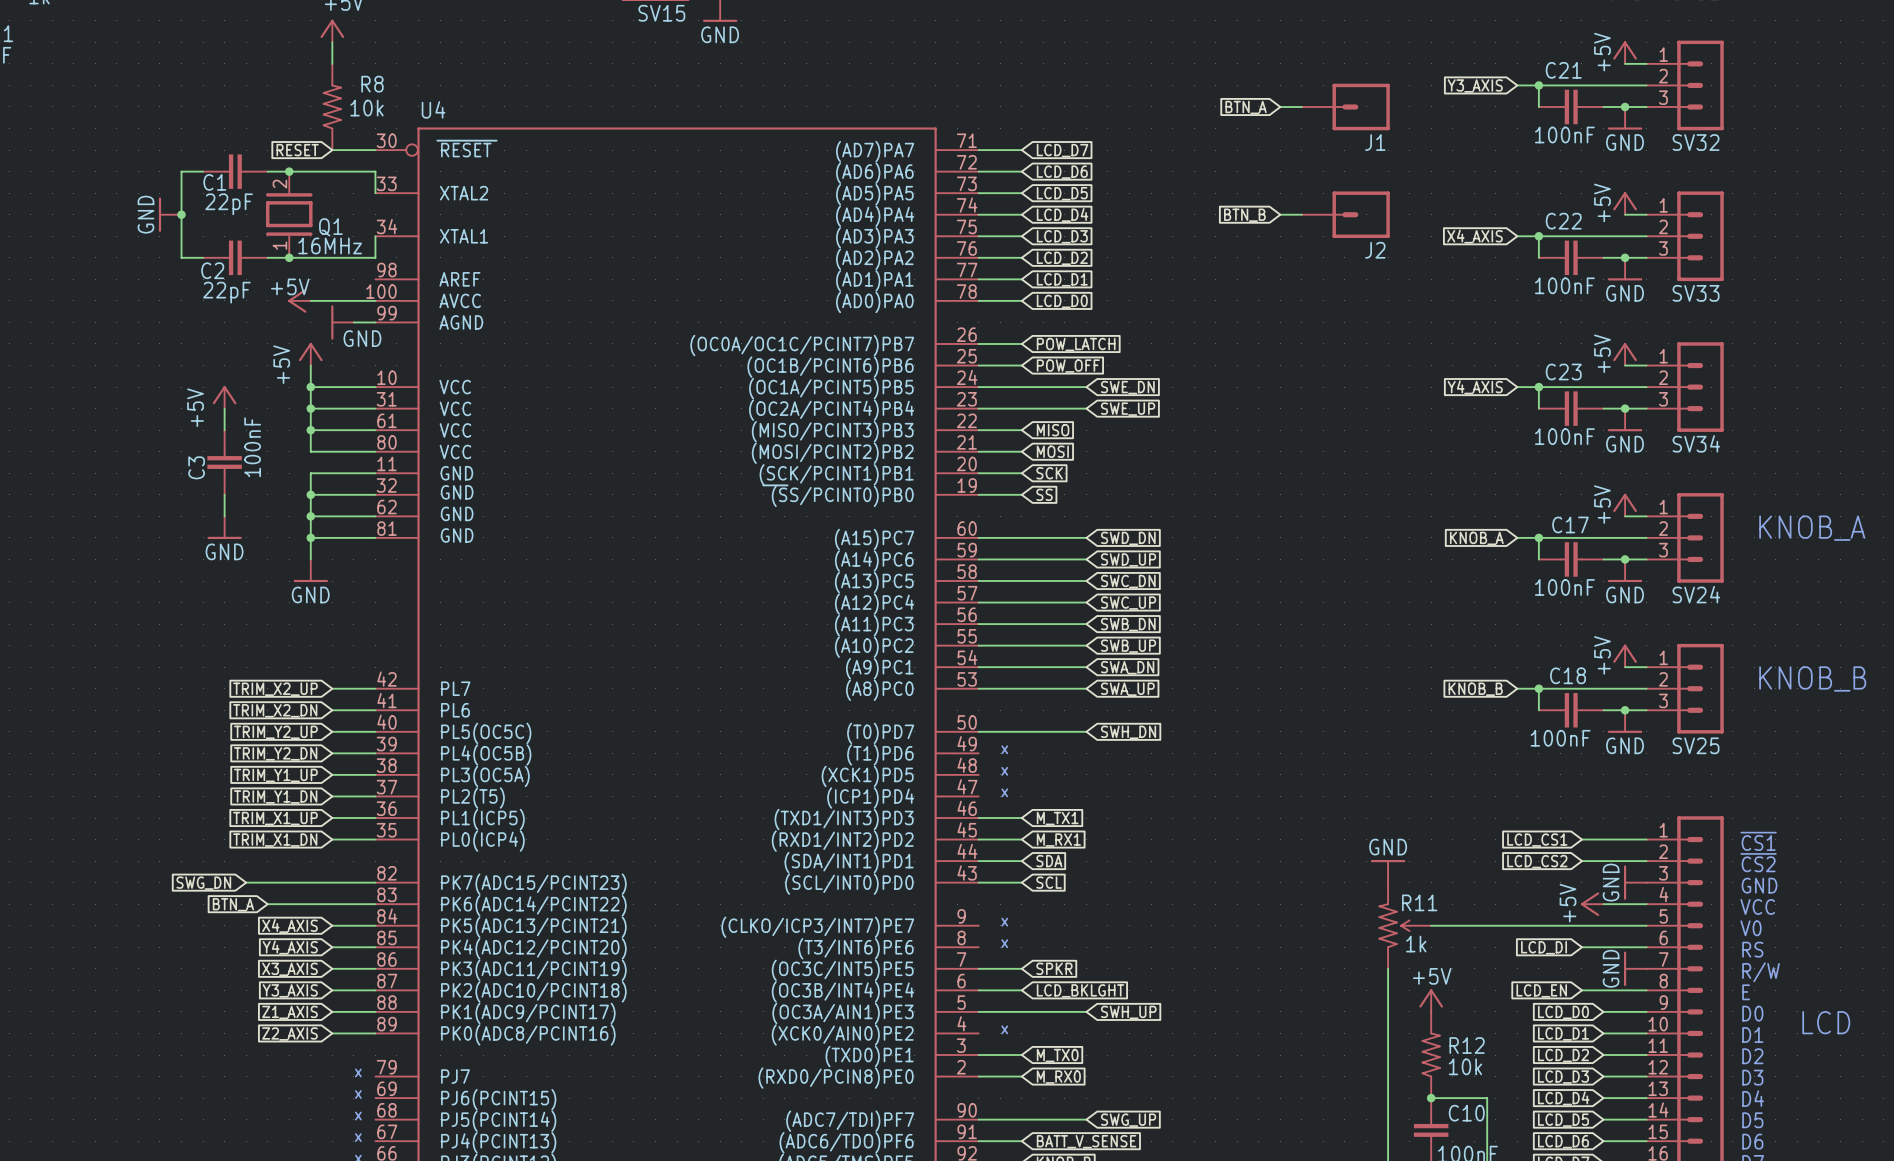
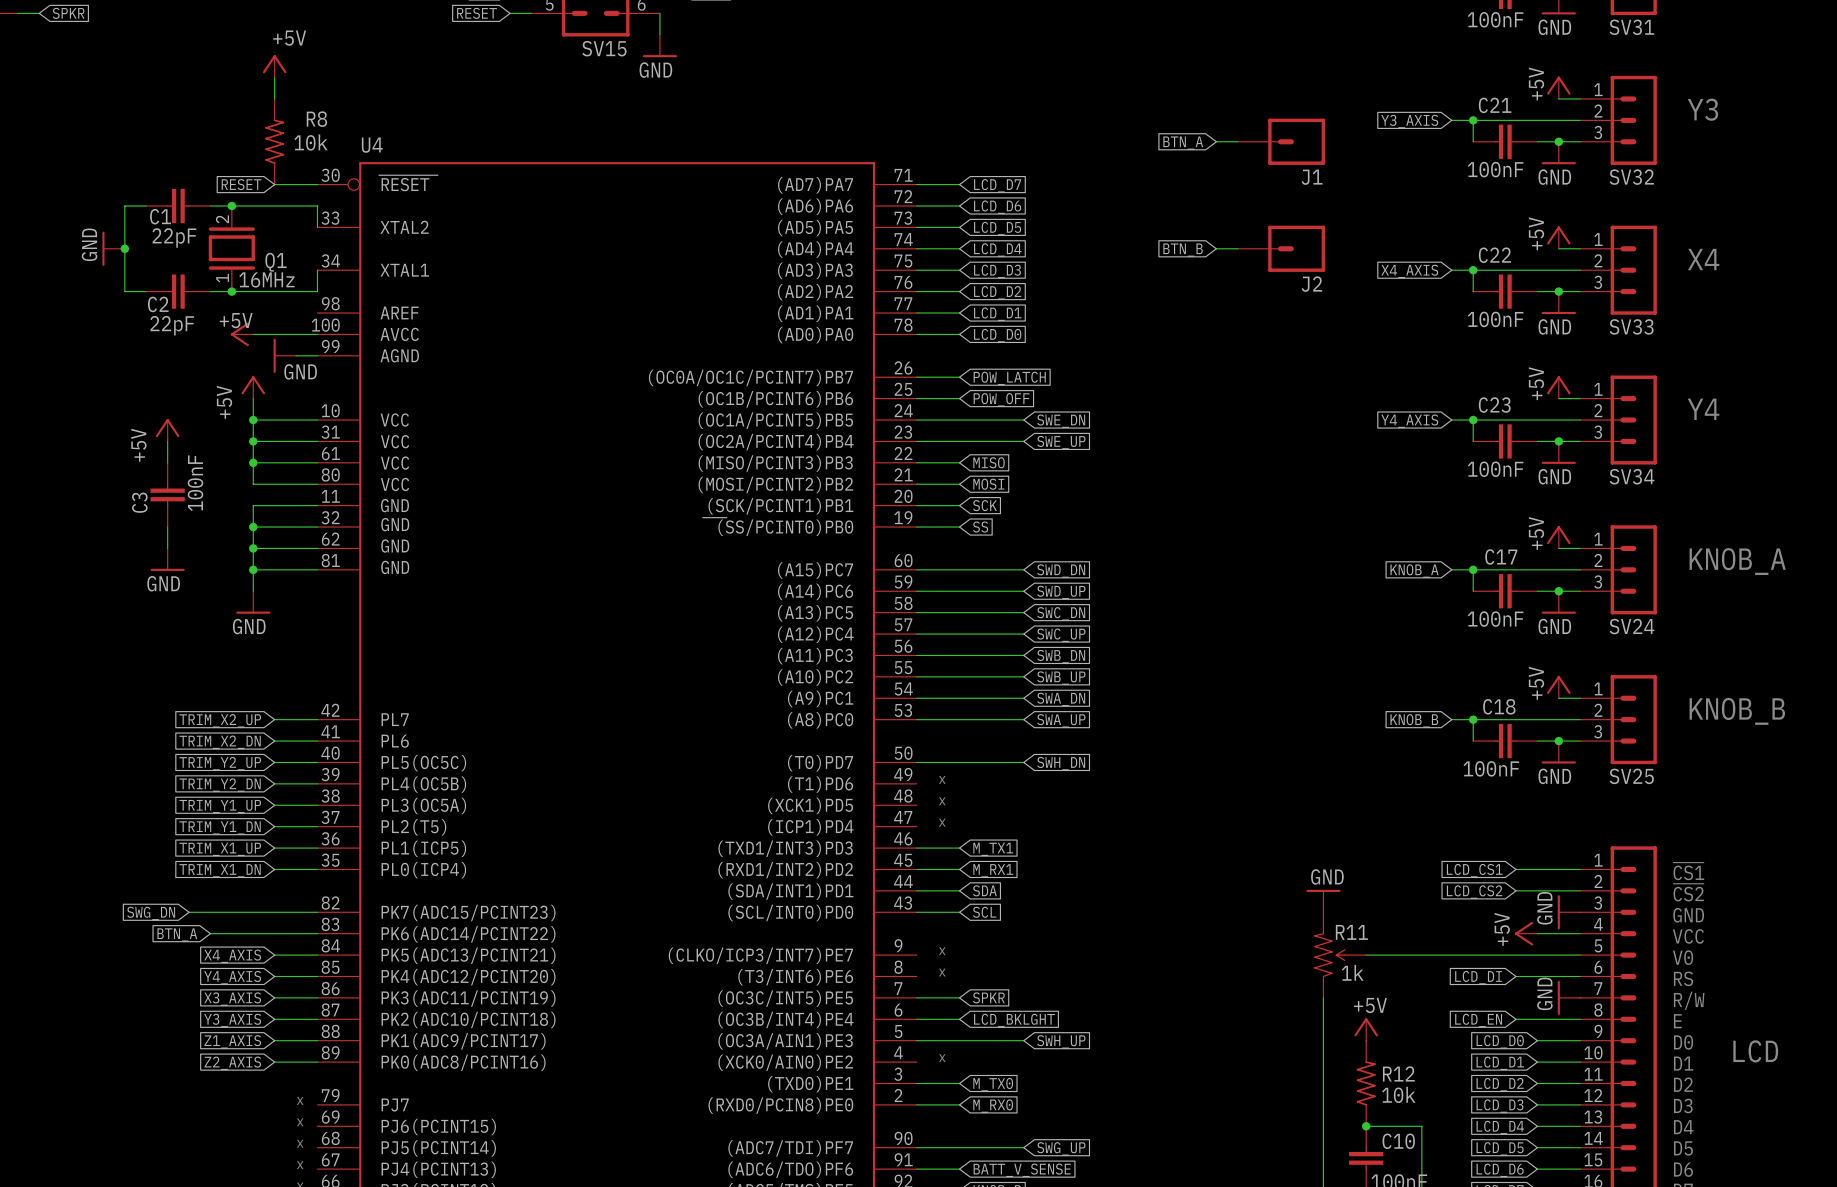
text: none -> Y3 (1702, 109)
text: none -> X4 (1703, 259)
text: none -> Y4 (1703, 409)

